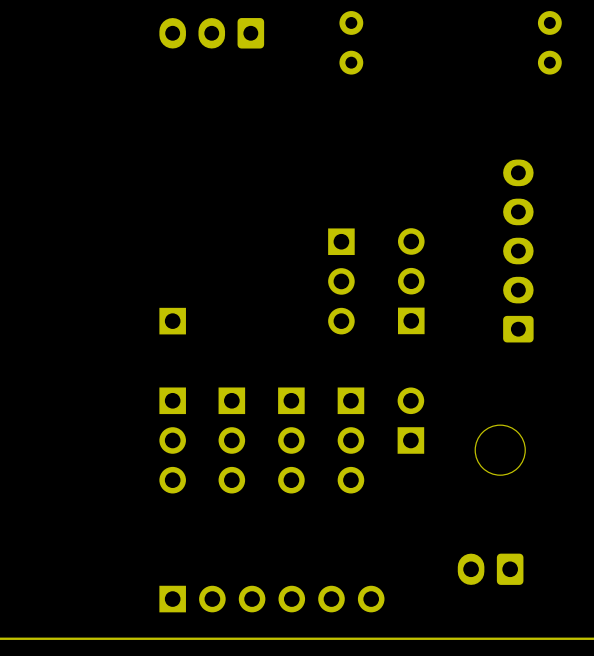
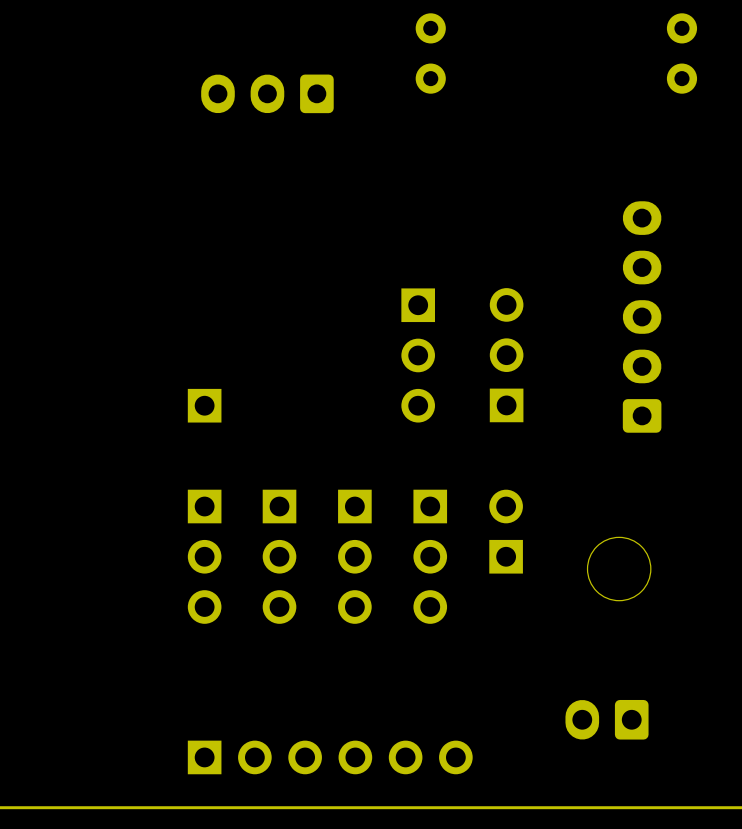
part position: (211, 33) -> (267, 93)

